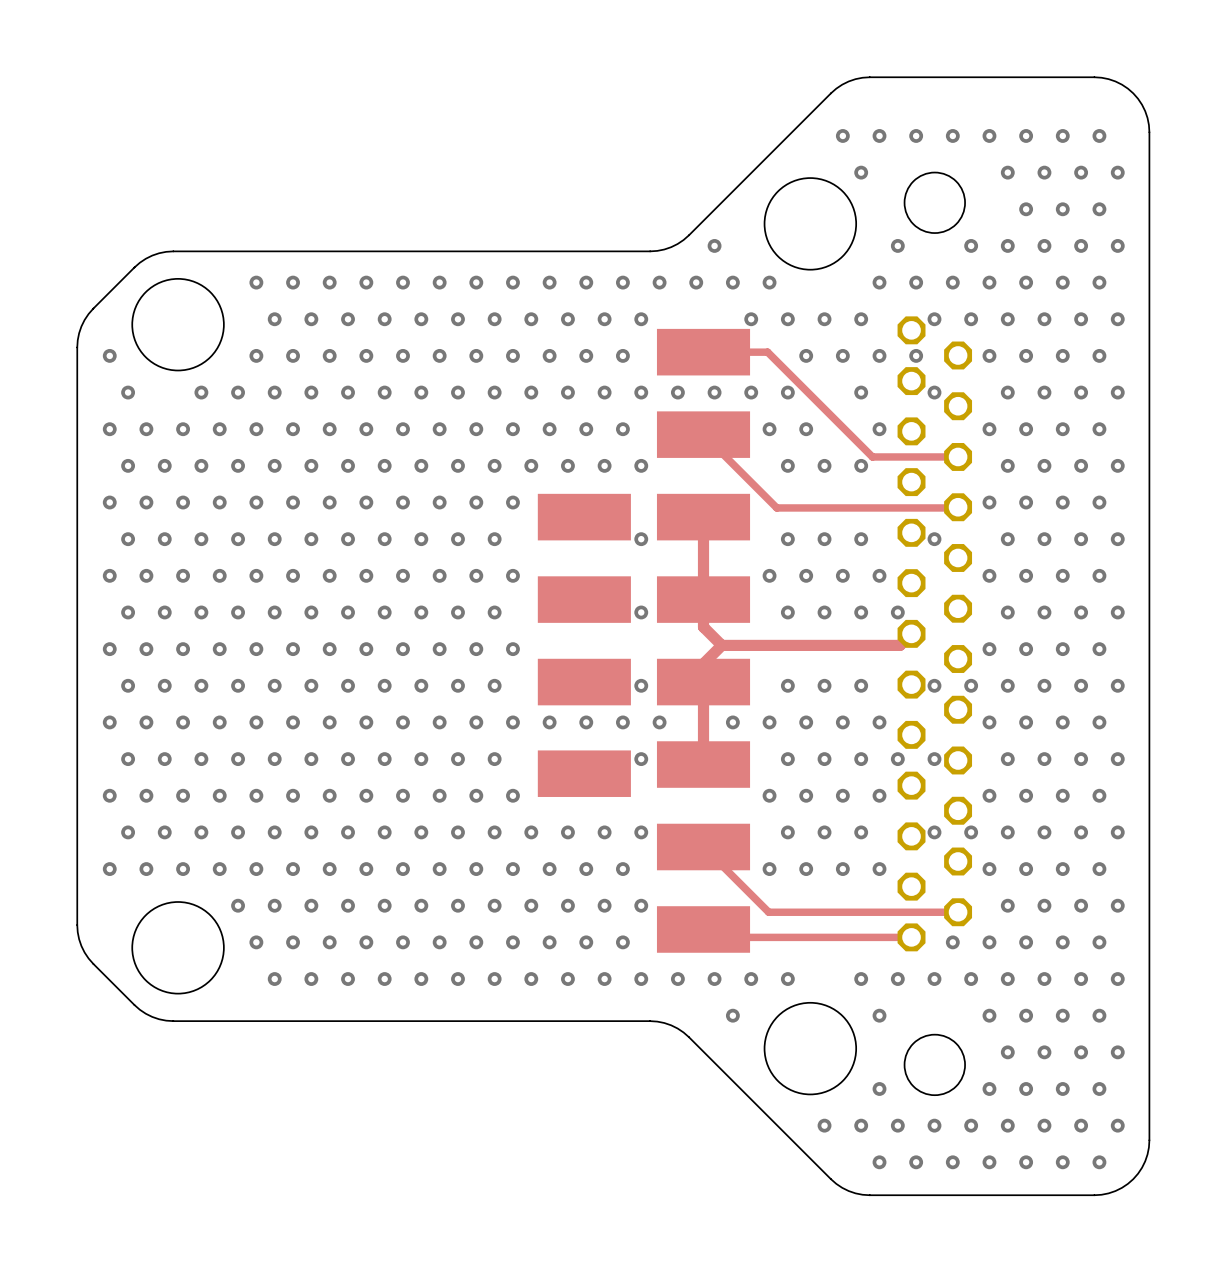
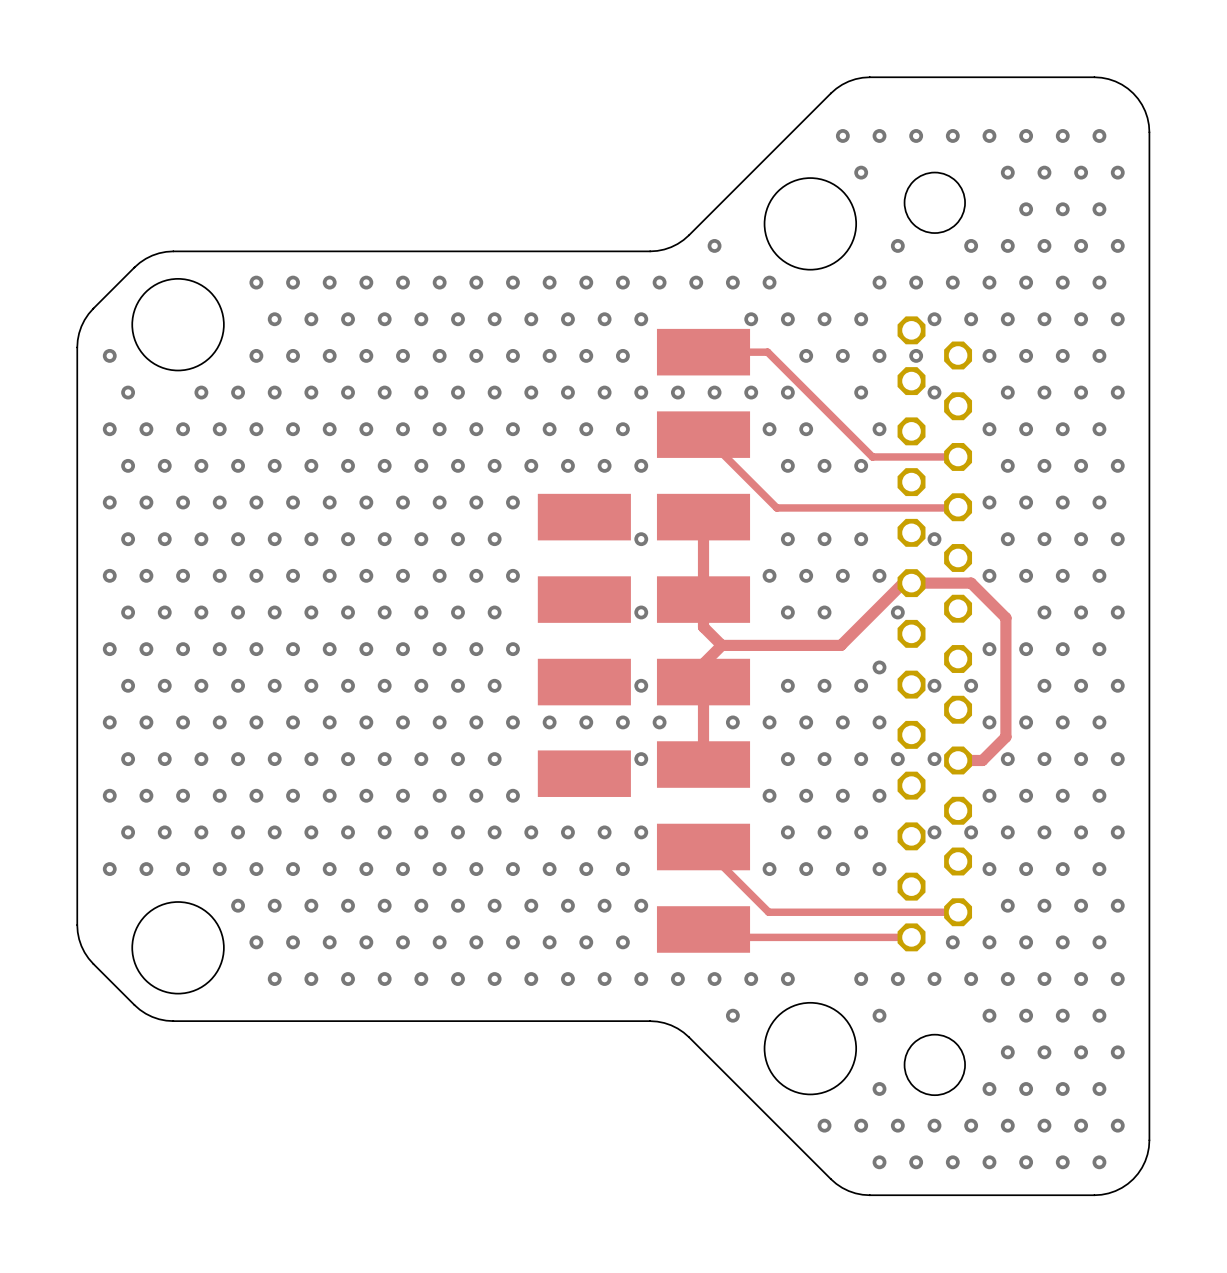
via position: (861, 612) -> (879, 667)
via: (1007, 612) -> none
top track: (911, 633) (899, 645) (840, 645) -> (958, 760) (982, 760) (1005, 737) (1005, 617) (971, 583) (903, 583) (840, 645)
via: (1007, 685) -> none

